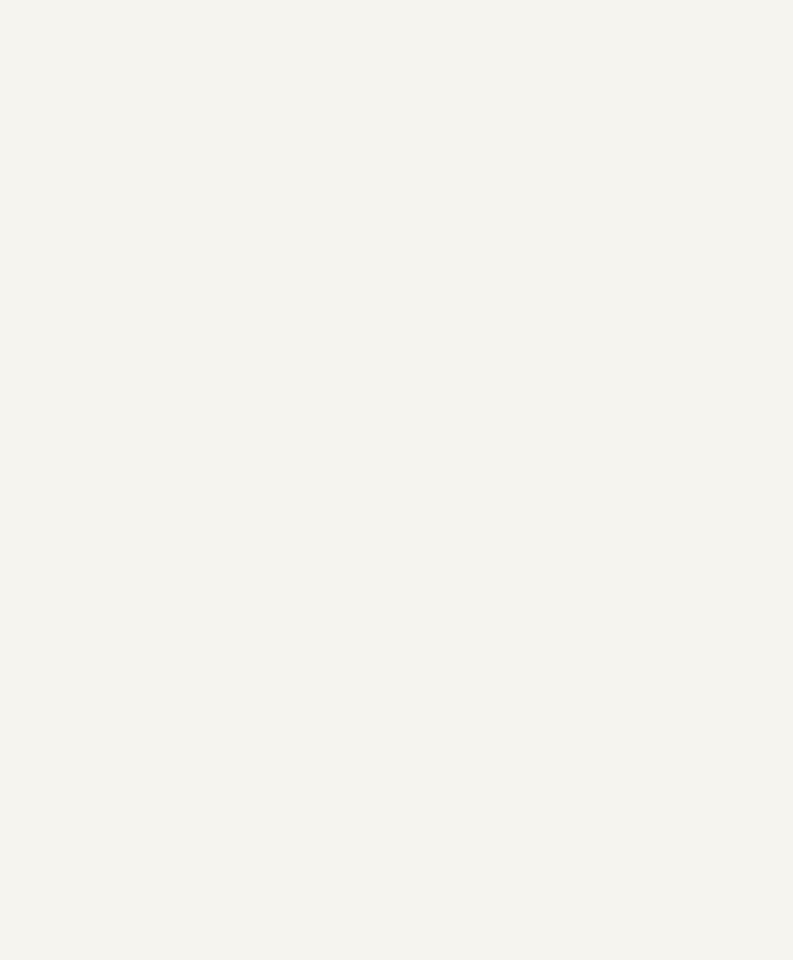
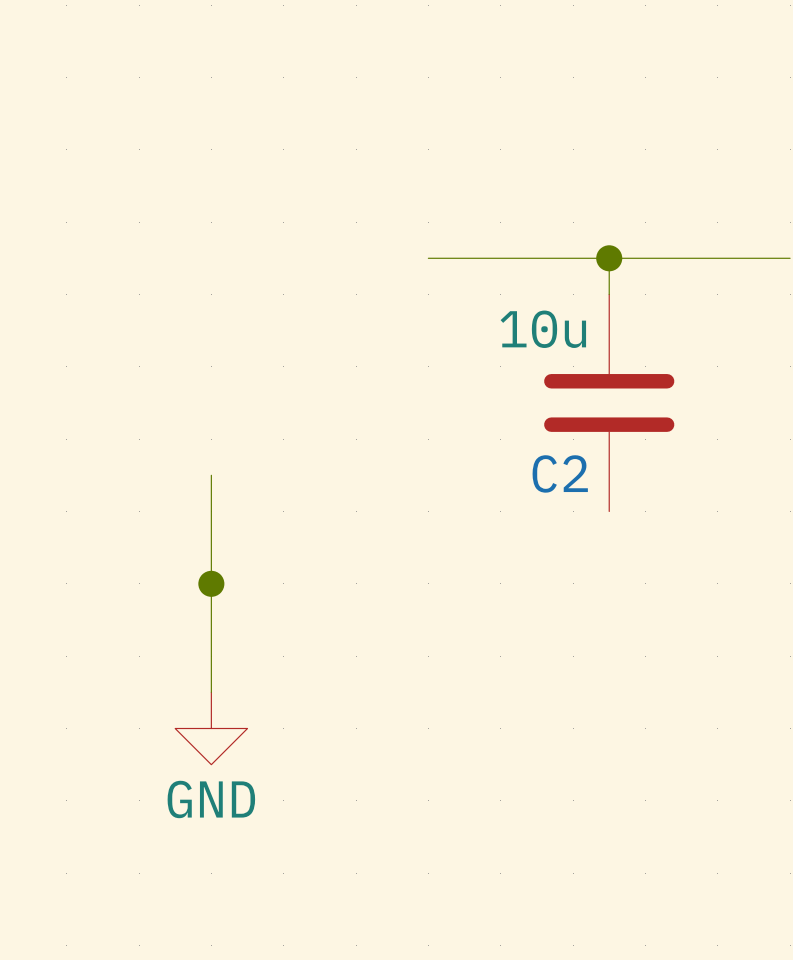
wire: none -> (428, 258) (790, 258)
wire: none -> (609, 258) (609, 294)
junction: none -> (609, 258)
C2: none -> 10u (609, 402)
wire: none -> (211, 475) (211, 692)
junction: none -> (211, 583)
power symbol: none -> GND (211, 728)

